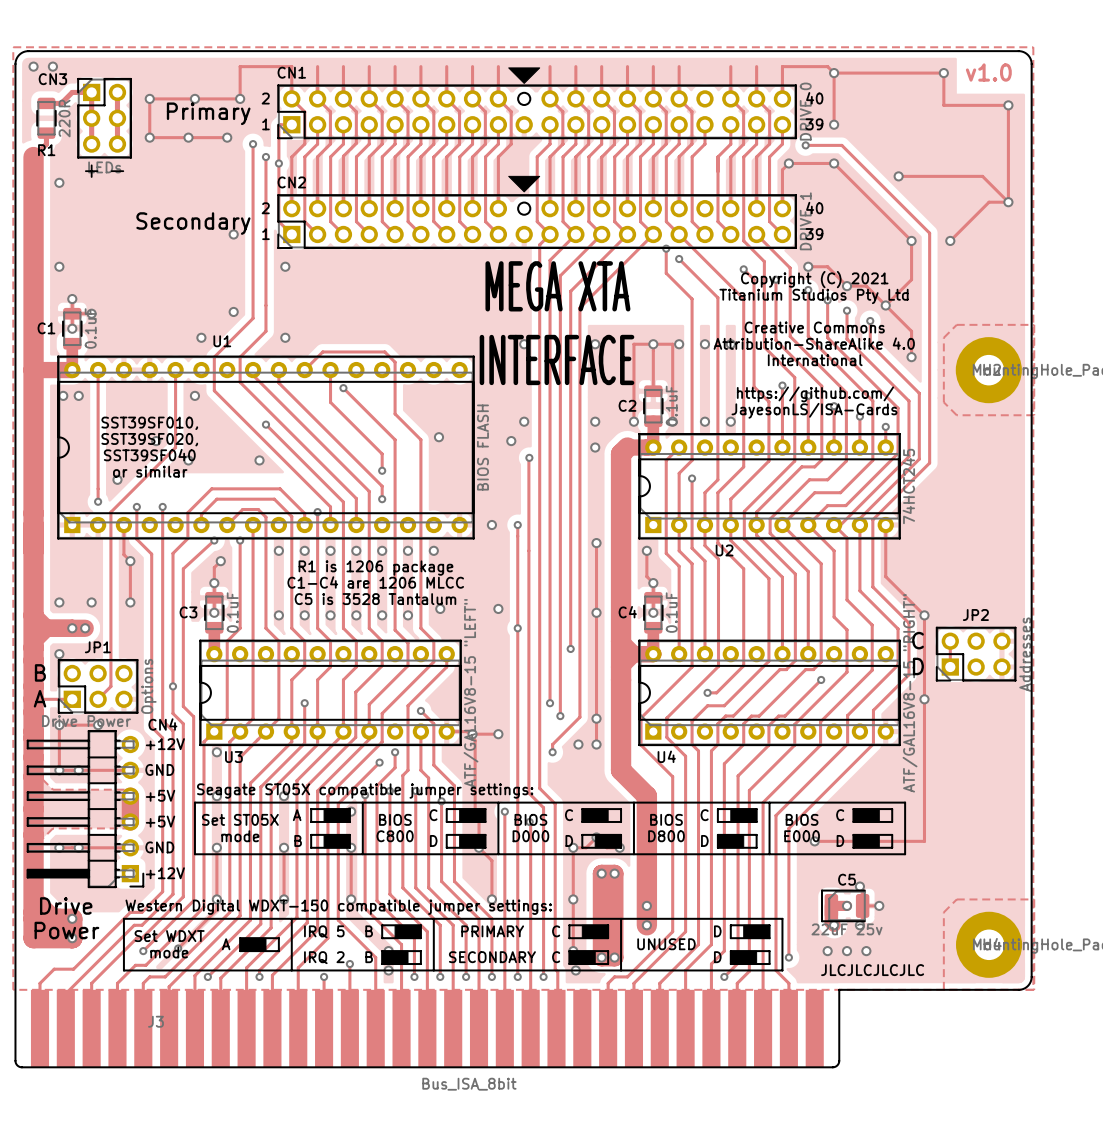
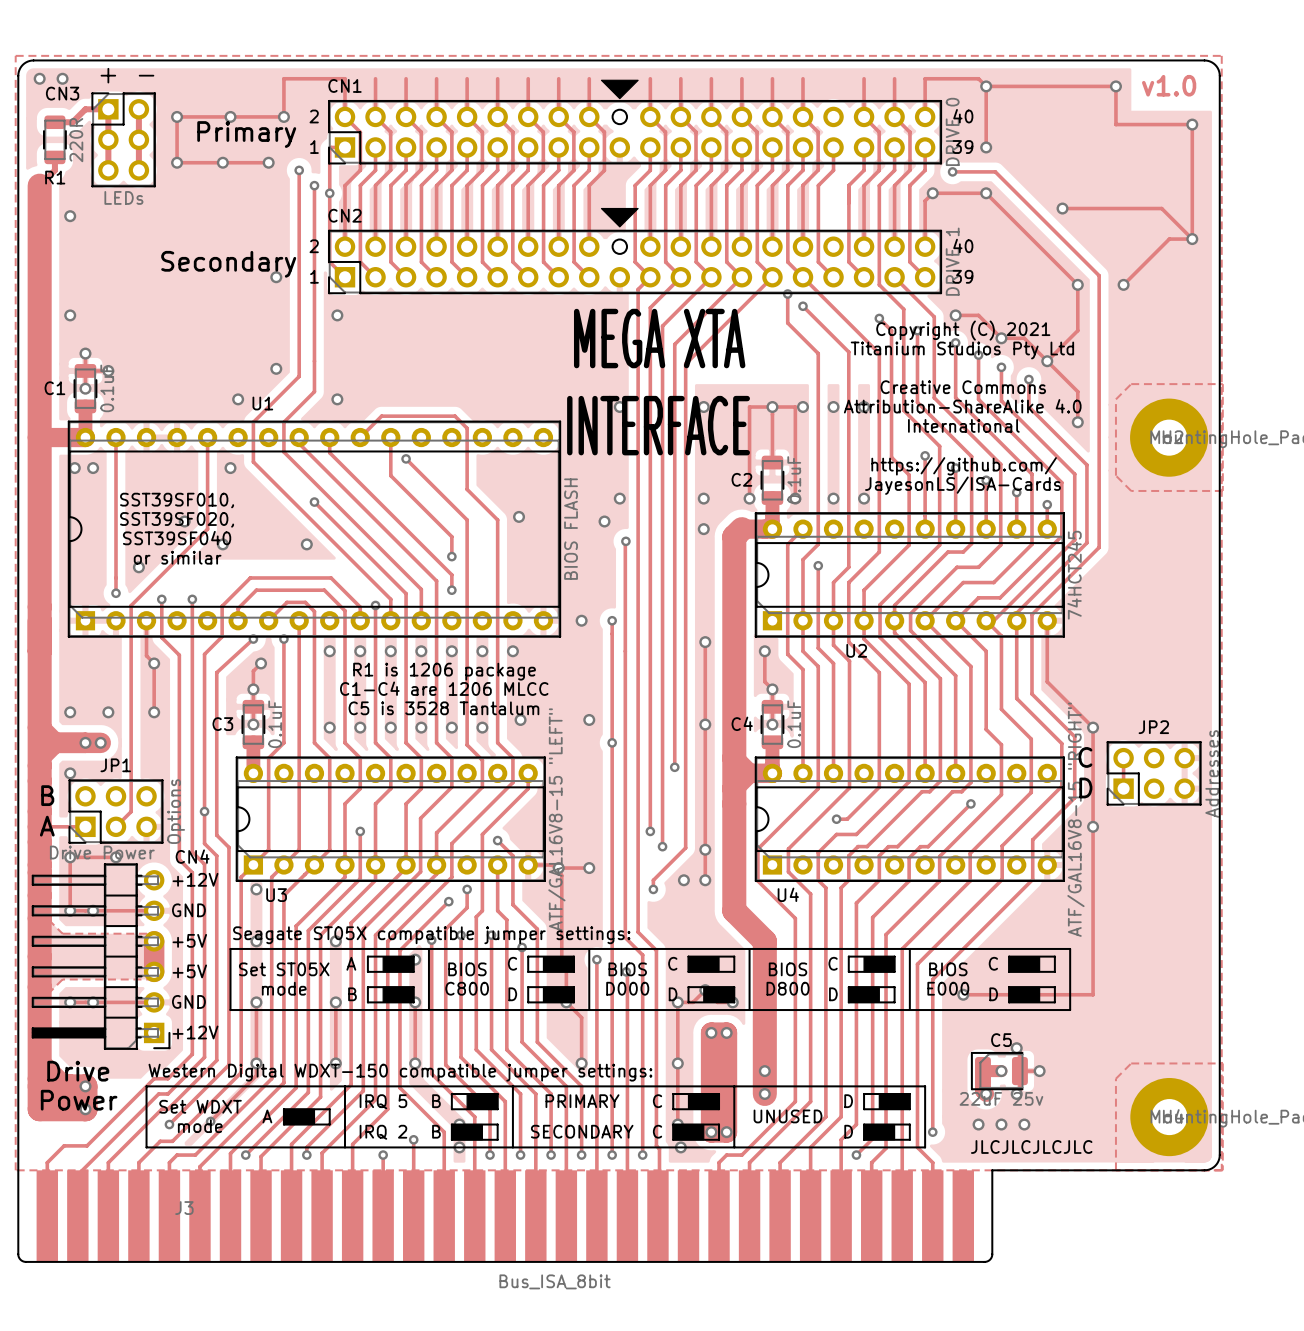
CN3 text position: + (91, 171) -> + (108, 75)
CN3 text position: - (117, 171) -> - (146, 75)

